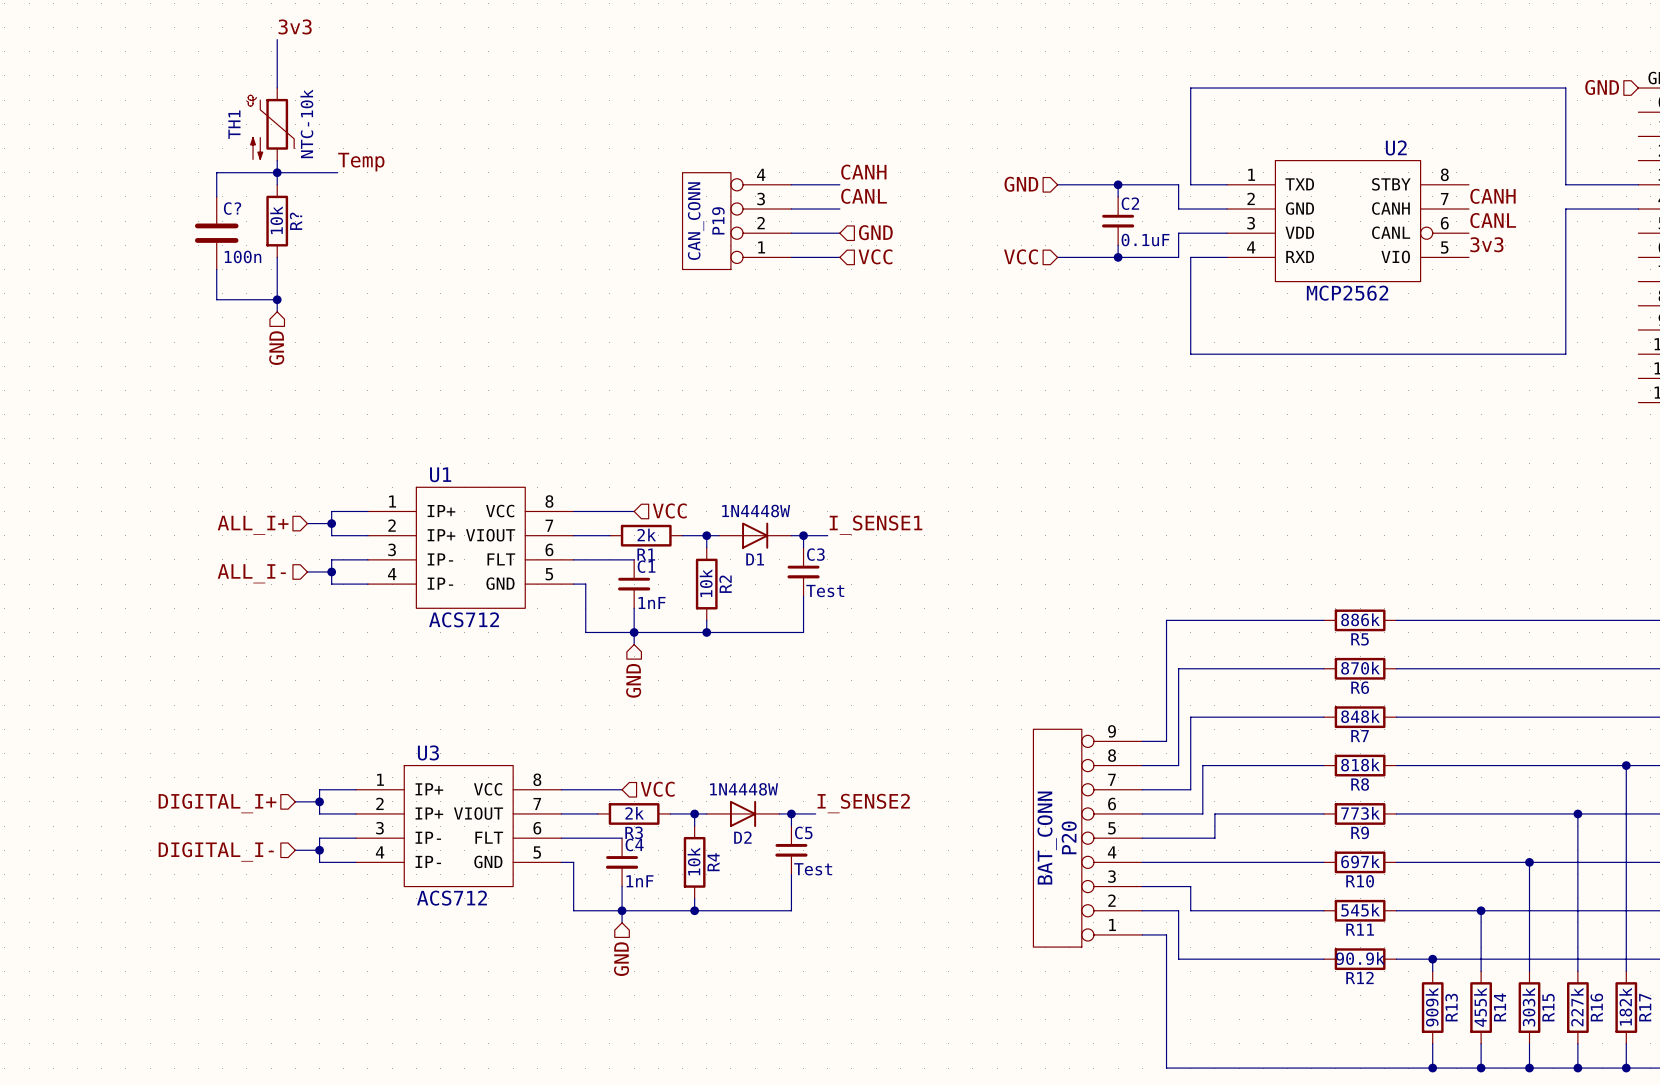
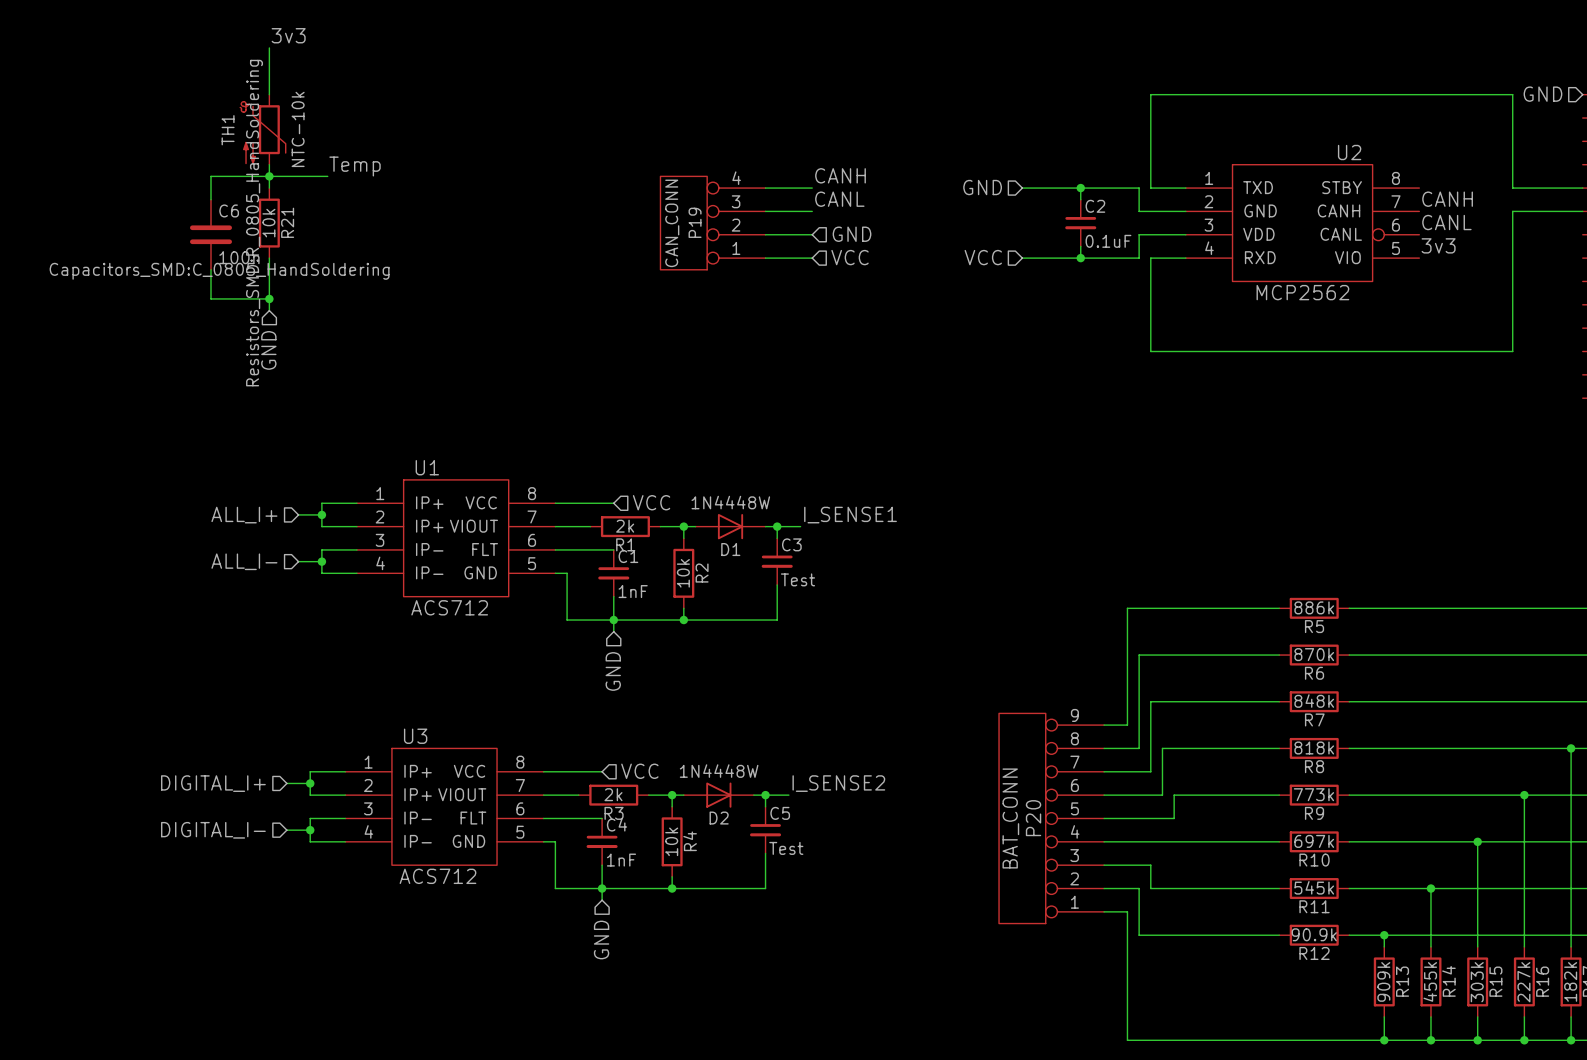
C? name: C? (232, 208) -> C6 (229, 210)
R? text: none -> Resistors_SMD:R_0805_HandSoldering (254, 223)
R? name: R? (296, 221) -> R21 (287, 222)
C? text: none -> Capacitors_SMD:C_0805_HandSoldering (219, 271)

